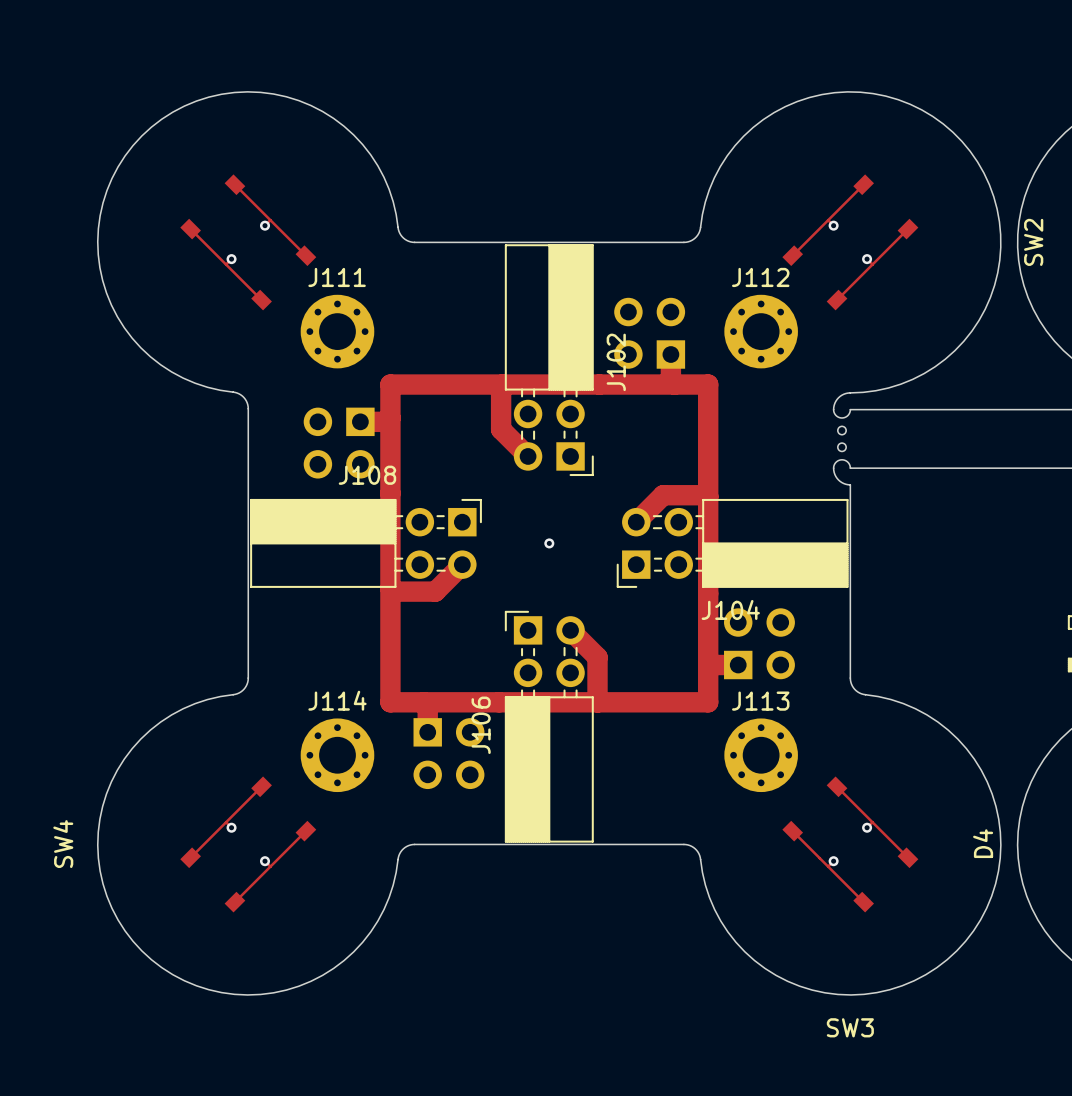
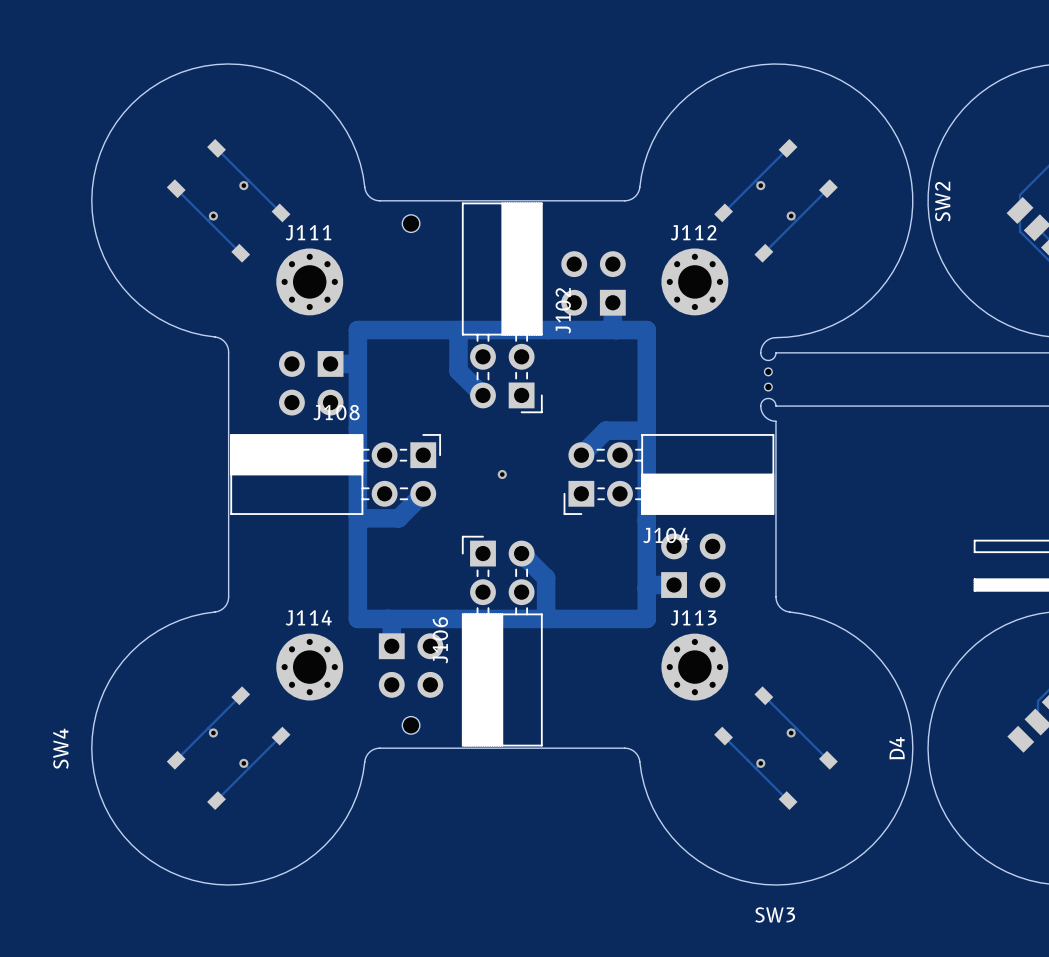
part: none -> (411, 223)
part: none -> (411, 725)

